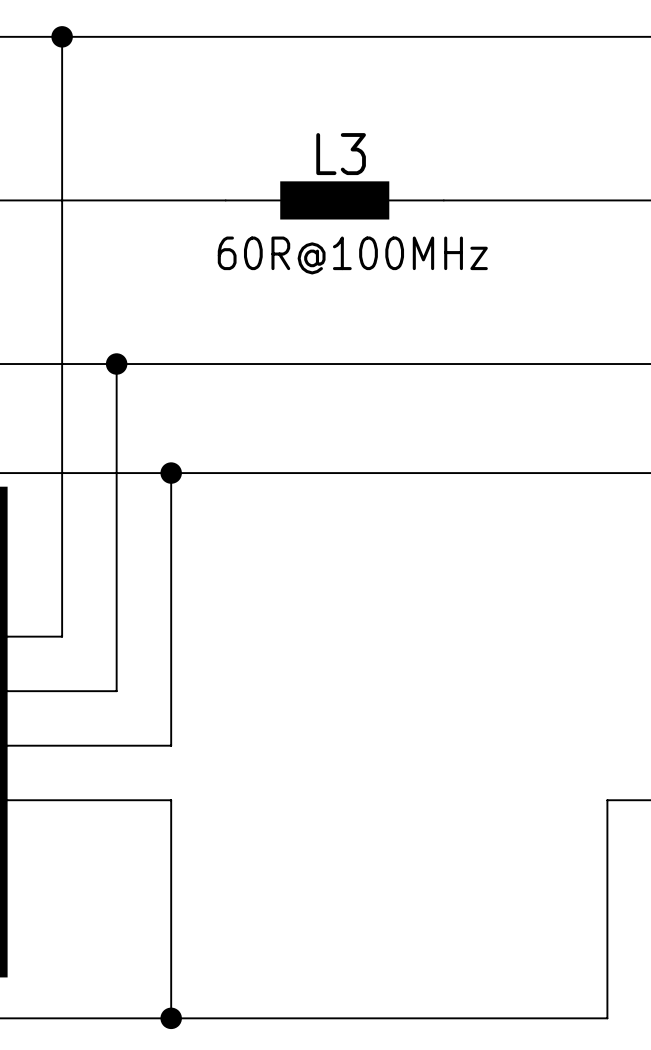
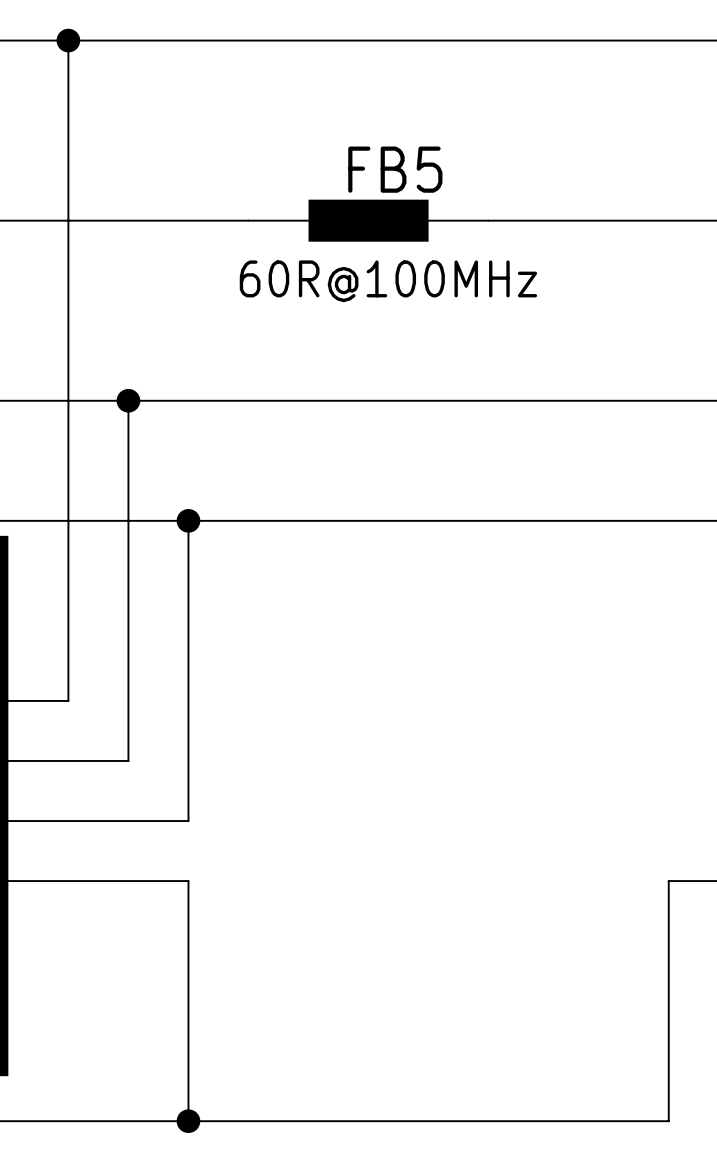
L3 name: L3 (341, 154) -> FB5 (395, 169)

